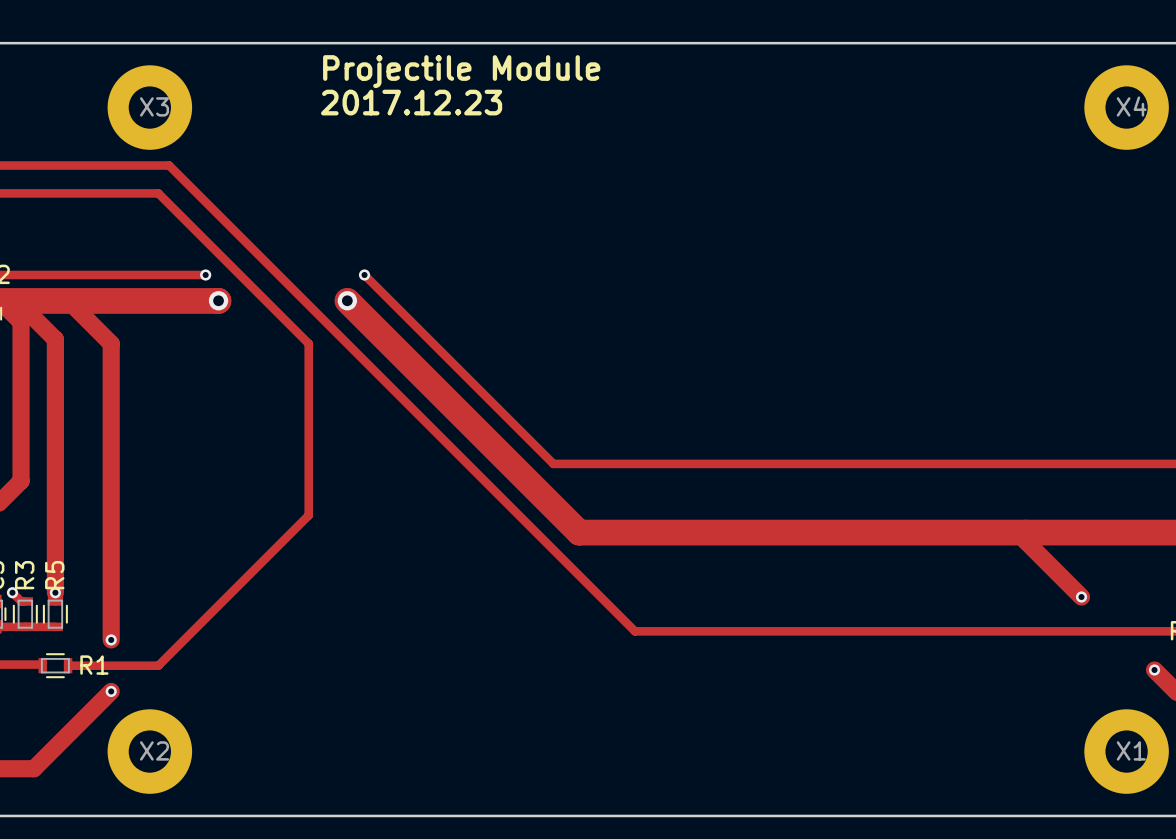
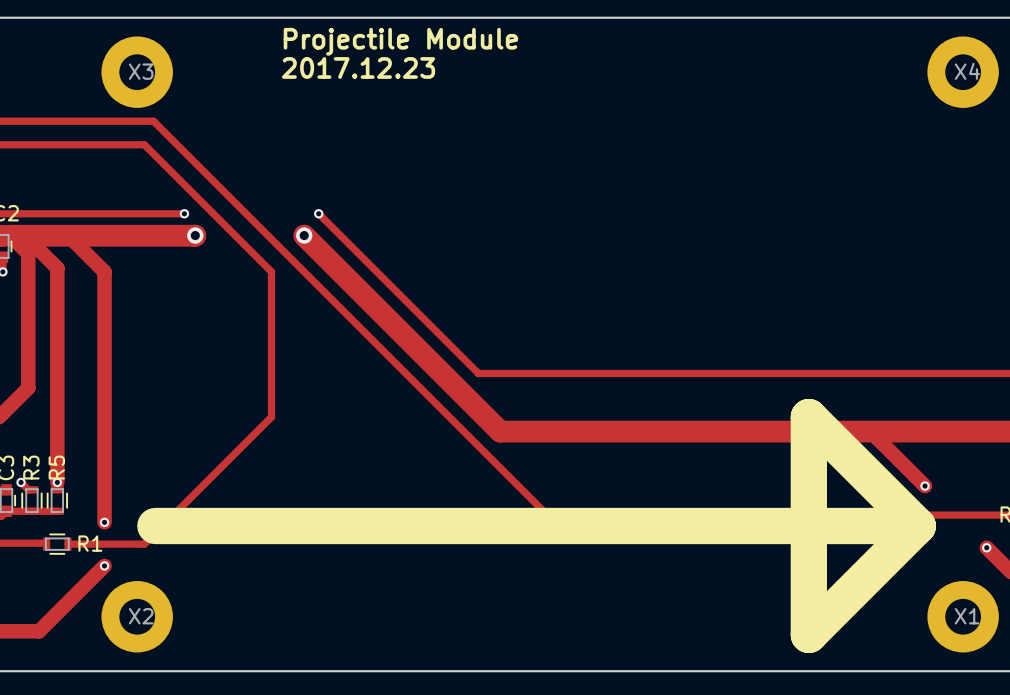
line: none -> (155, 525) (917, 525)
line: none -> (917, 525) (808, 634) (808, 417) (917, 525)

